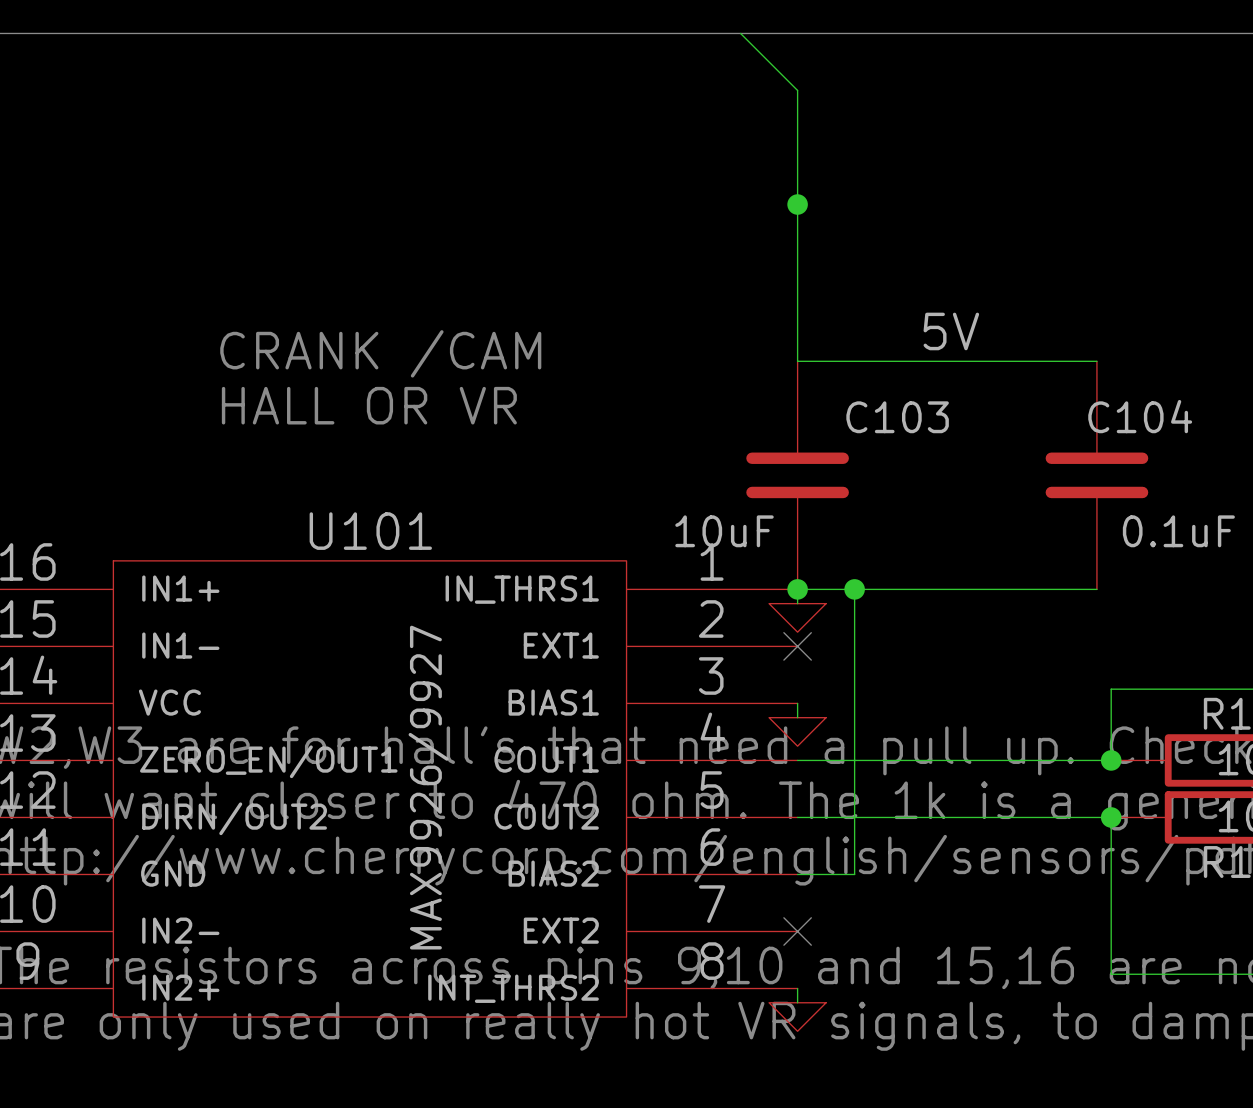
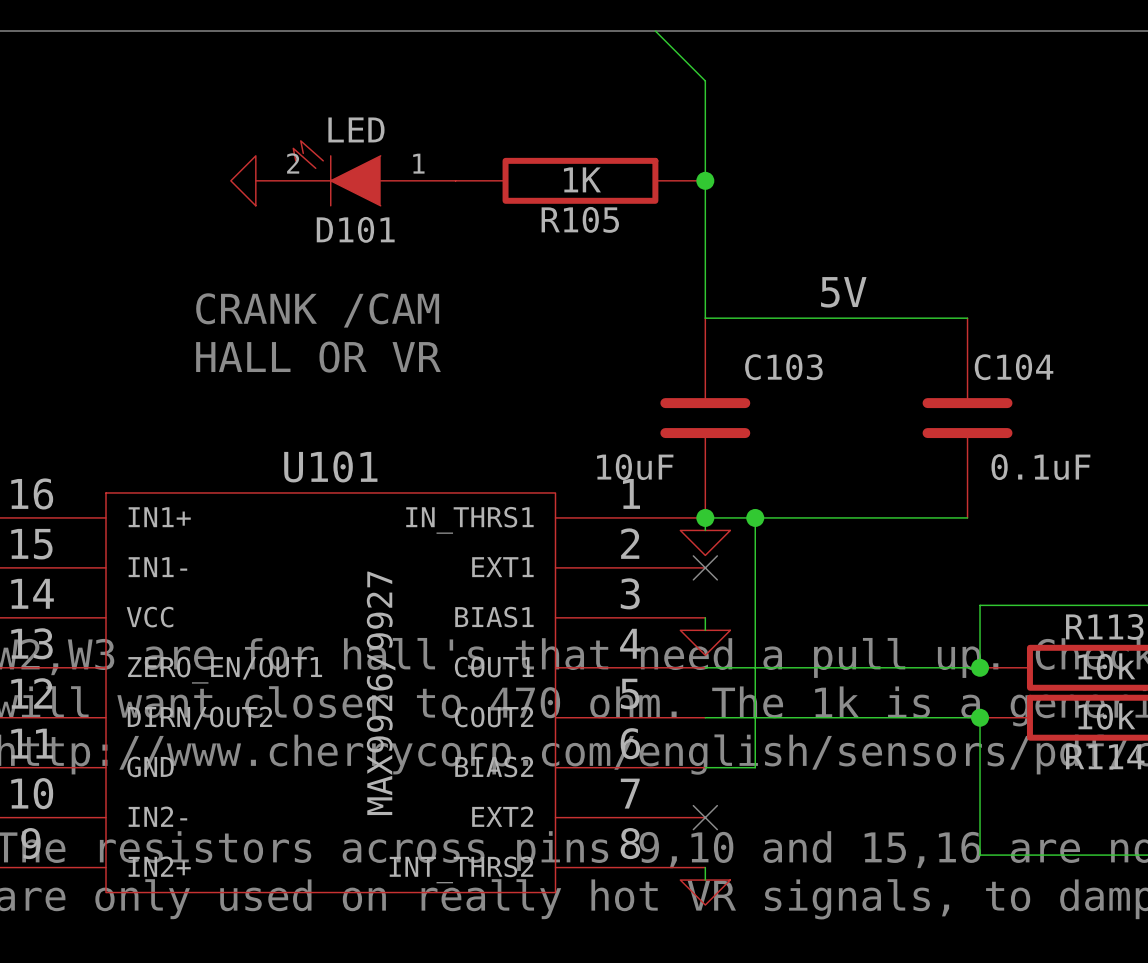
D101: none -> LED (355, 173)
power symbol: none -> (243, 180)
R105: none -> 1K (580, 180)

